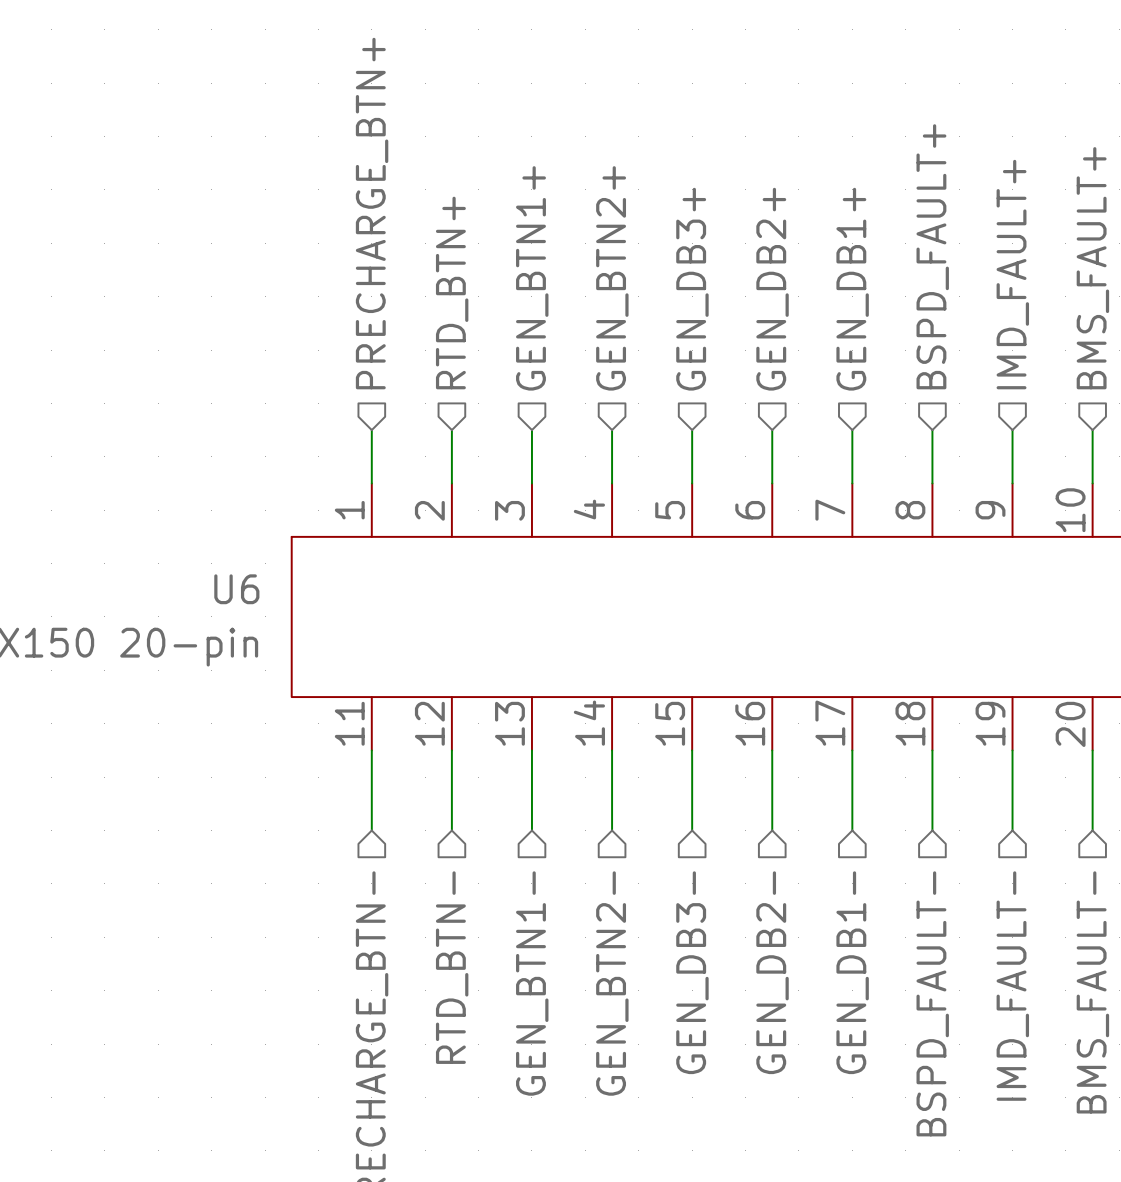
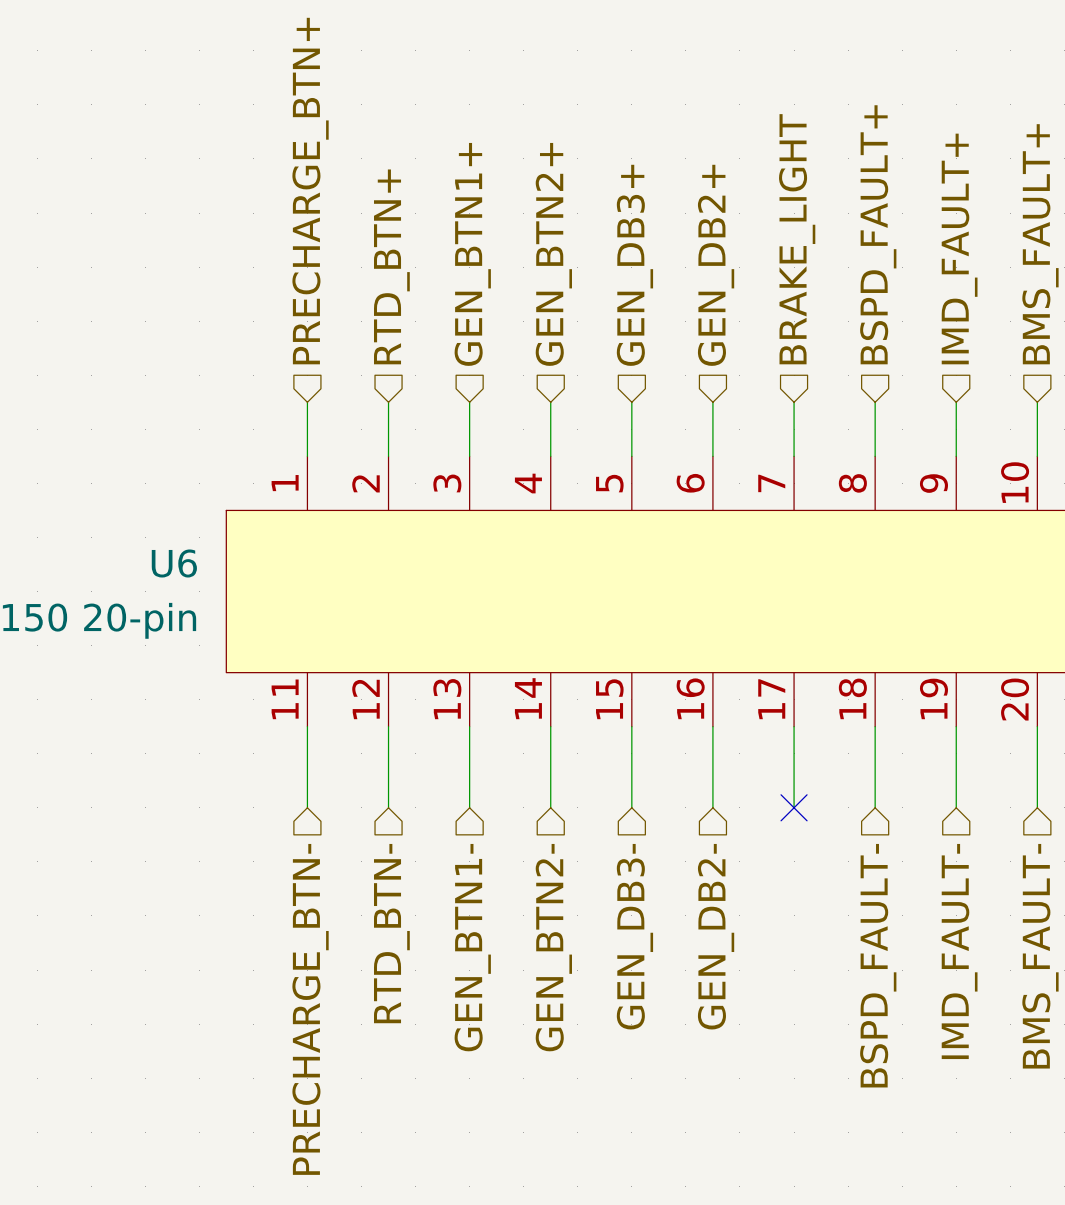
hierarchical label: GEN_DB1+ (852, 289) -> BRAKE_LIGHT (797, 239)
no-connect mark: none -> (794, 807)
hierarchical label: GEN_DB1- (852, 972) -> none

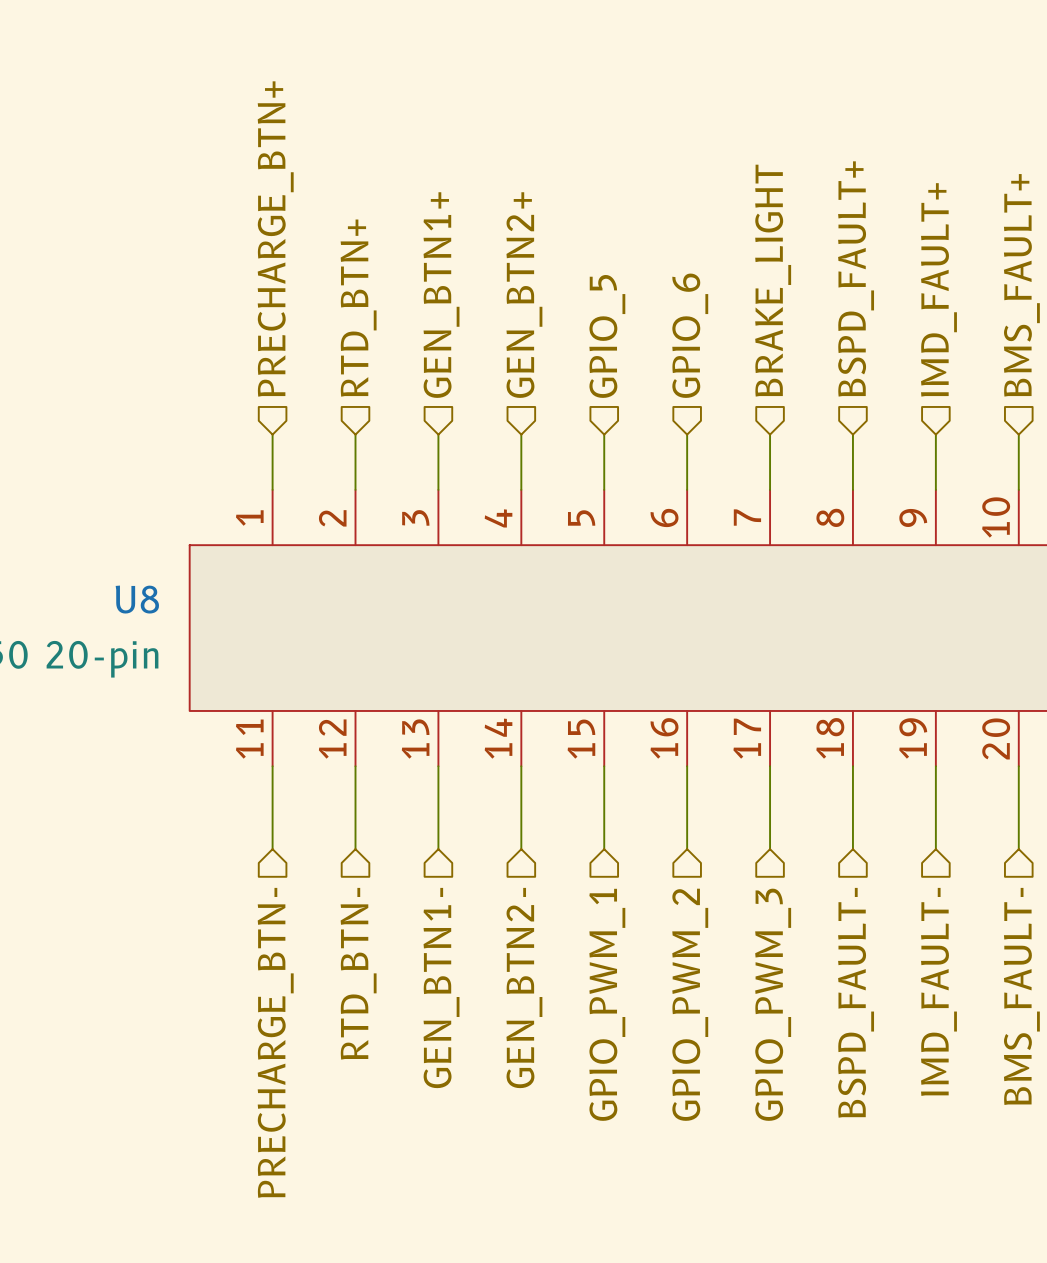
hierarchical label: GEN_DB3+ (634, 265) -> GPIO_5 (607, 336)
hierarchical label: GEN_DB2+ (716, 265) -> GPIO_6 (690, 335)
U6 name: U6 (174, 563) -> U8 (137, 599)
no-connect mark: (794, 807) -> none
hierarchical label: GEN_DB3- (634, 936) -> GPIO_PWM_1 (607, 1004)
hierarchical label: GEN_DB2- (716, 936) -> GPIO_PWM_2 (690, 1004)
hierarchical label: none -> GPIO_PWM_3 (773, 1004)

